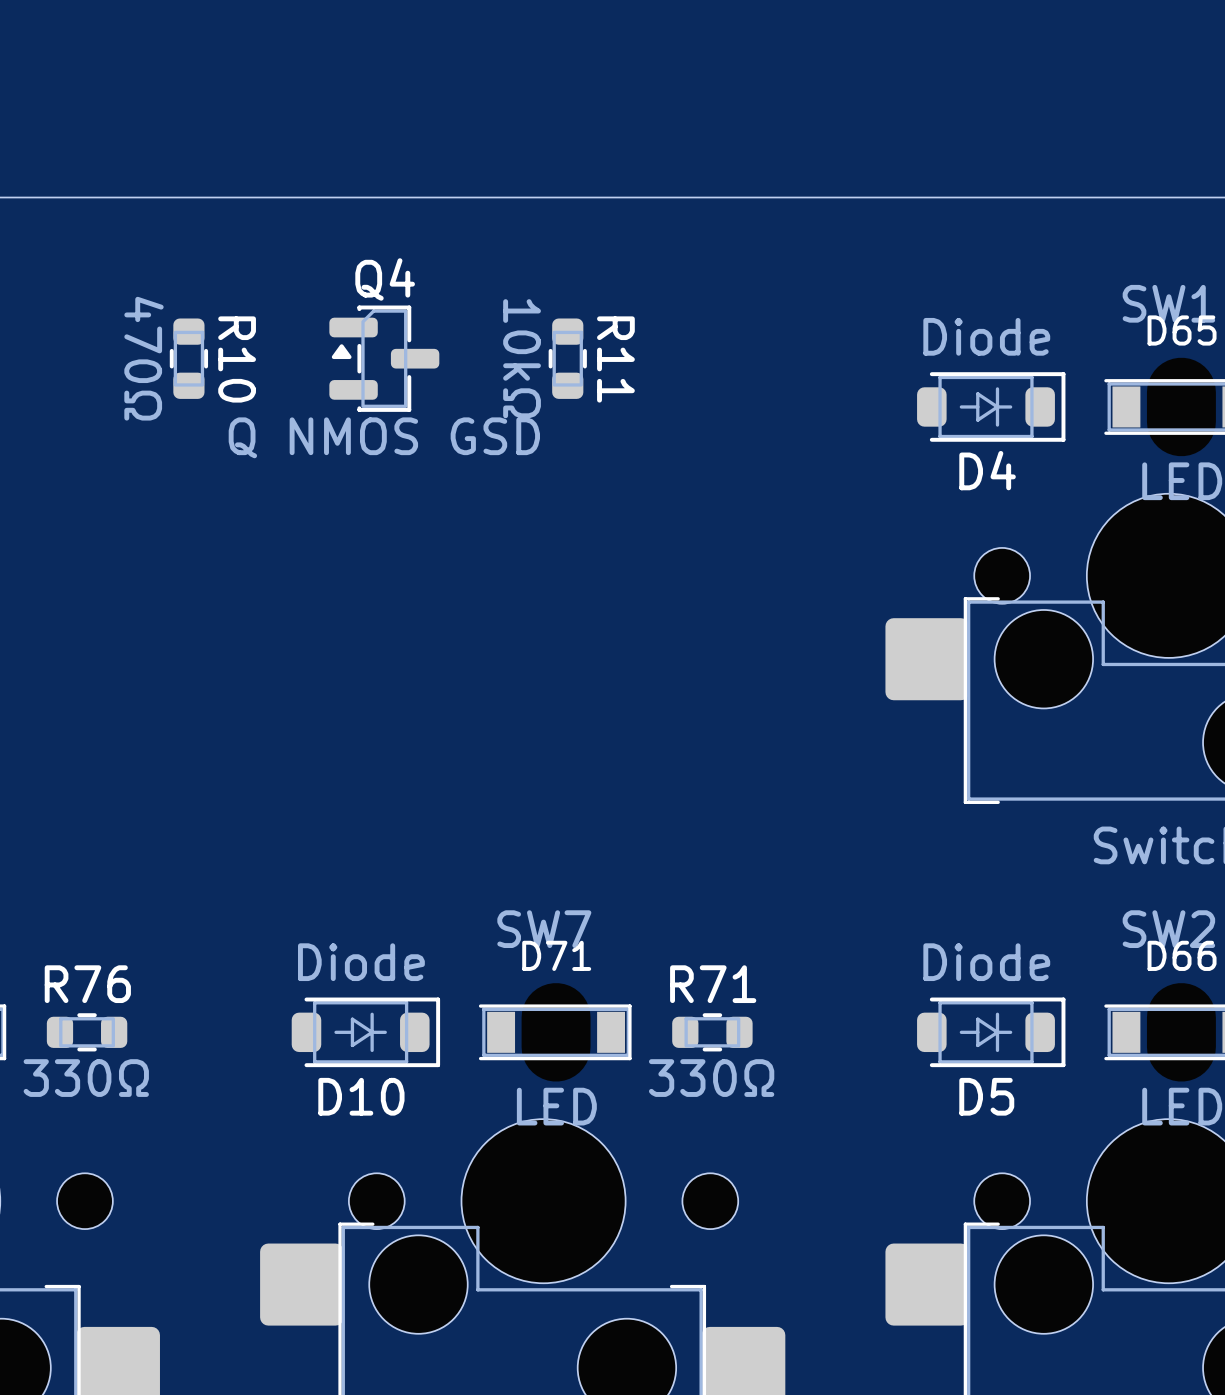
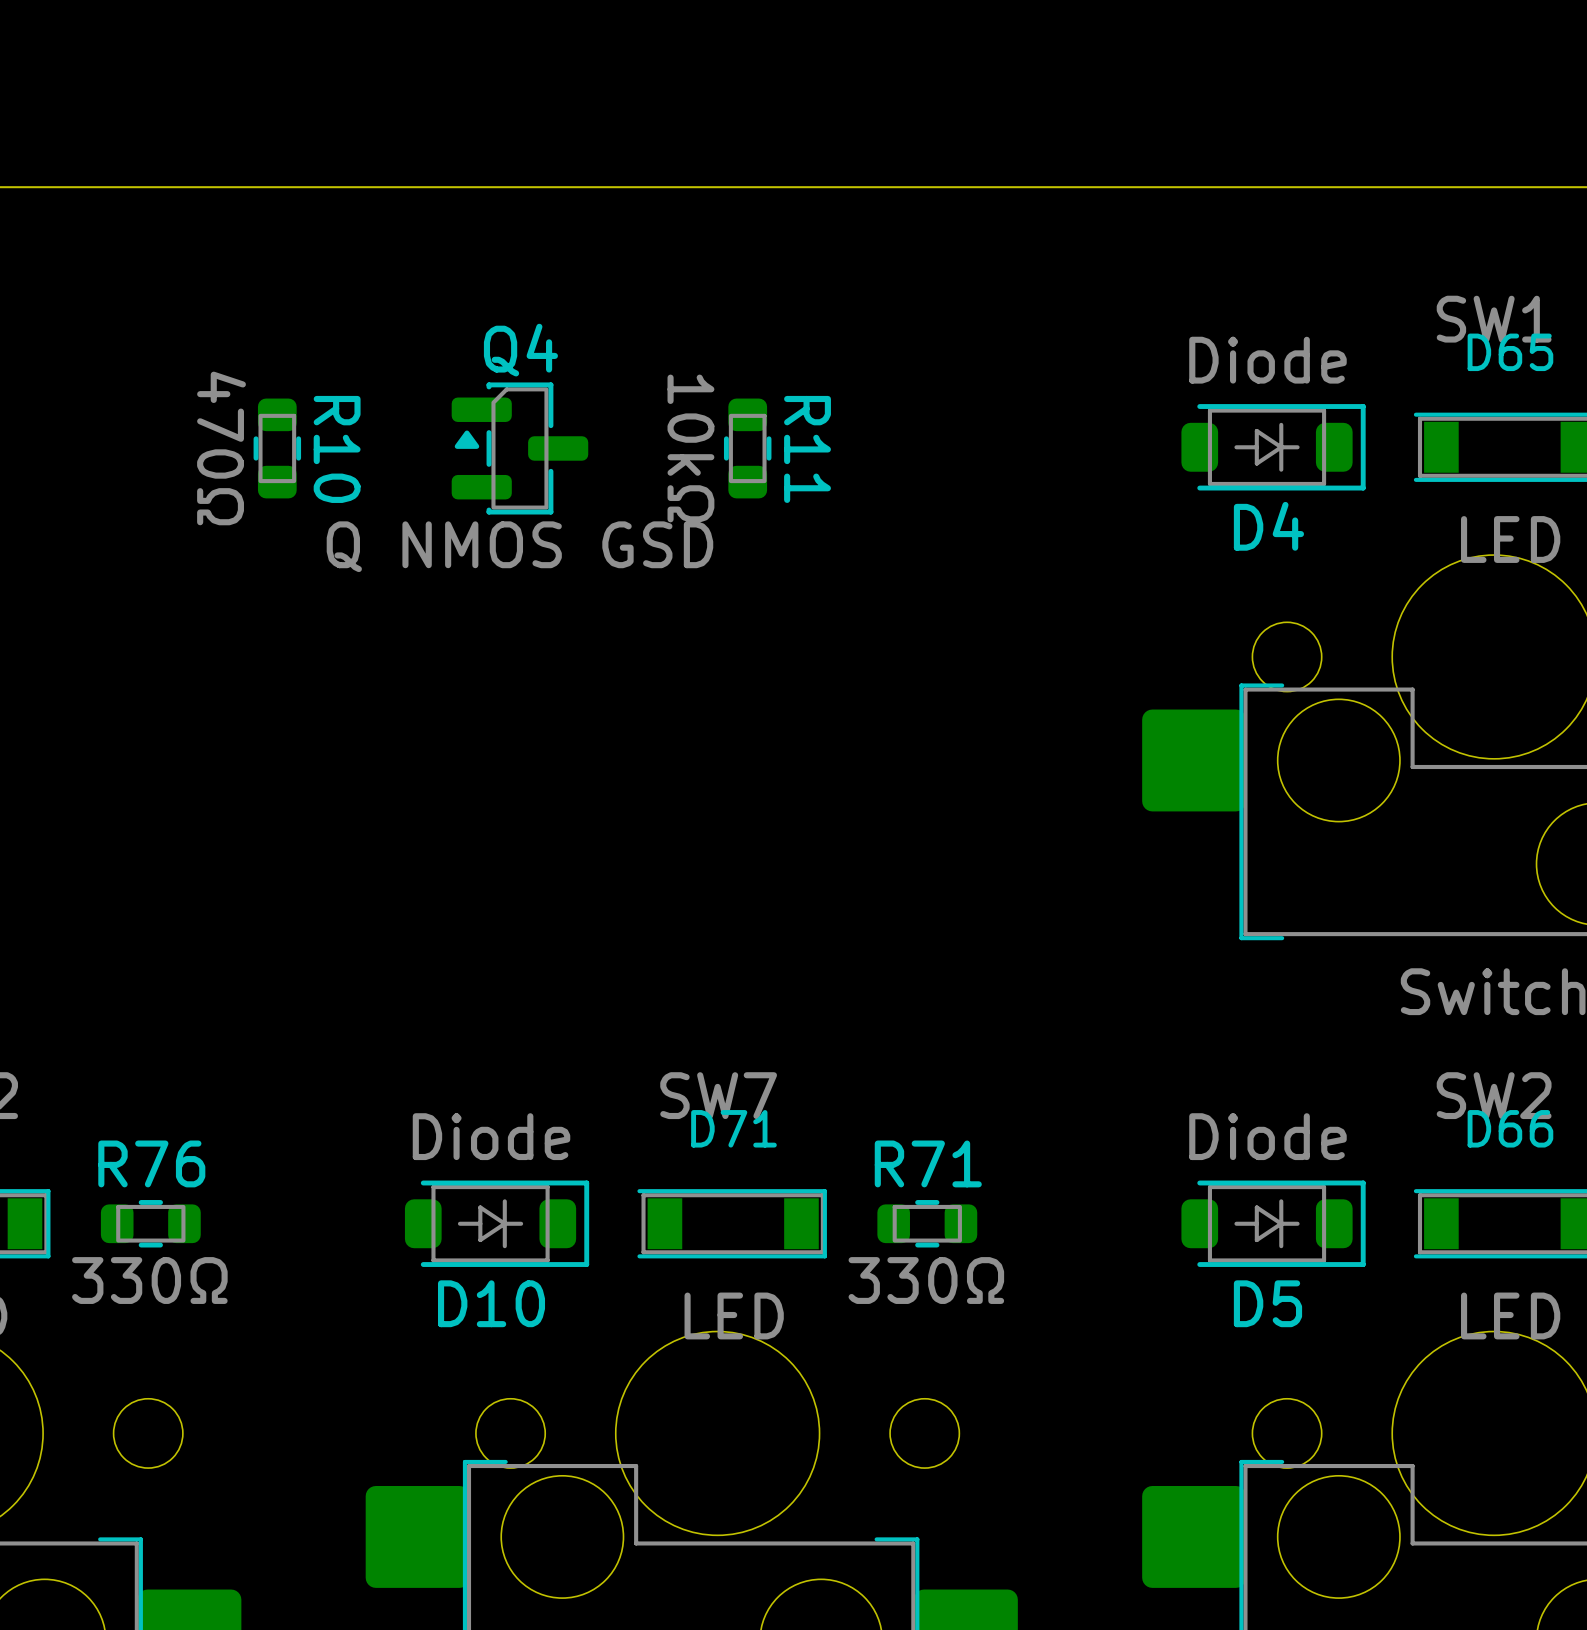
R10 position: (188, 358) -> (277, 448)
Q4 position: (384, 358) -> (519, 448)
R11 position: (567, 358) -> (747, 448)

